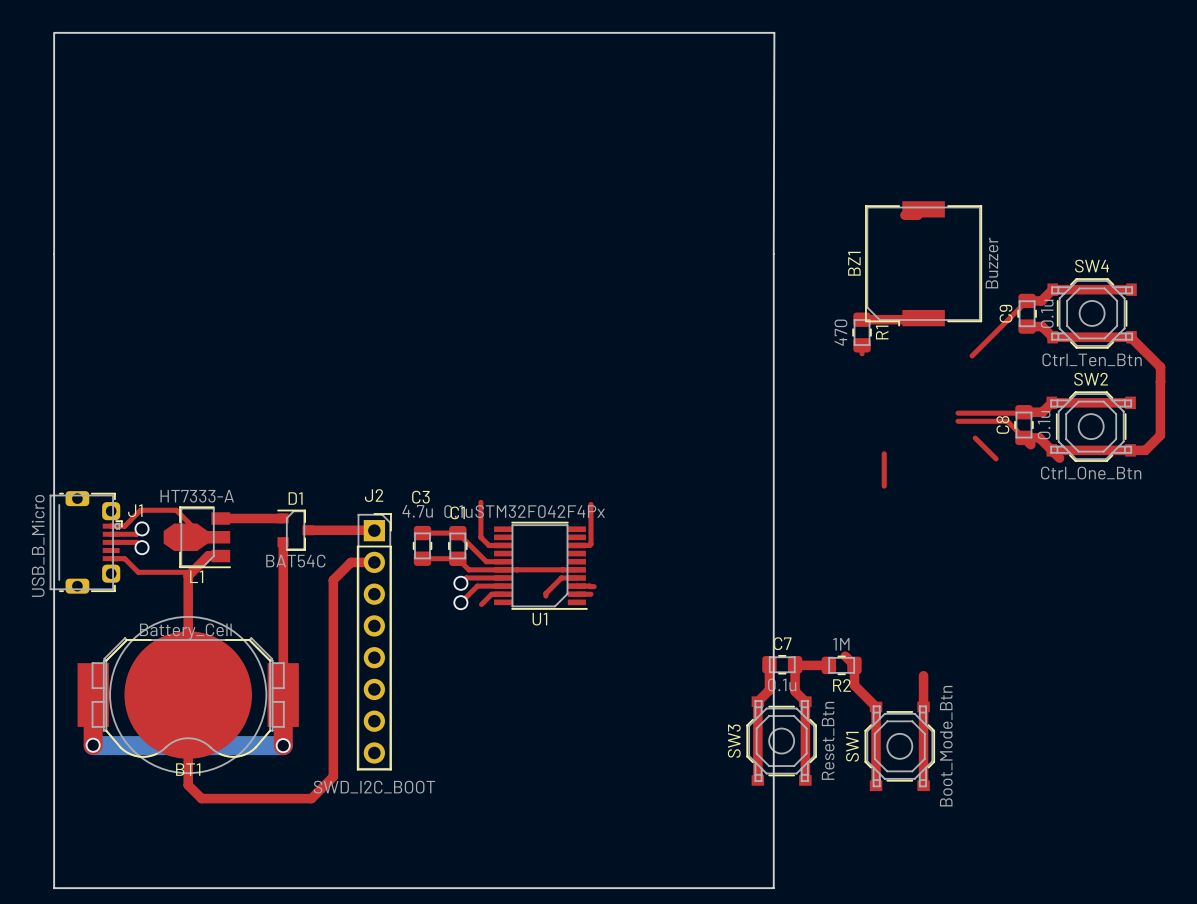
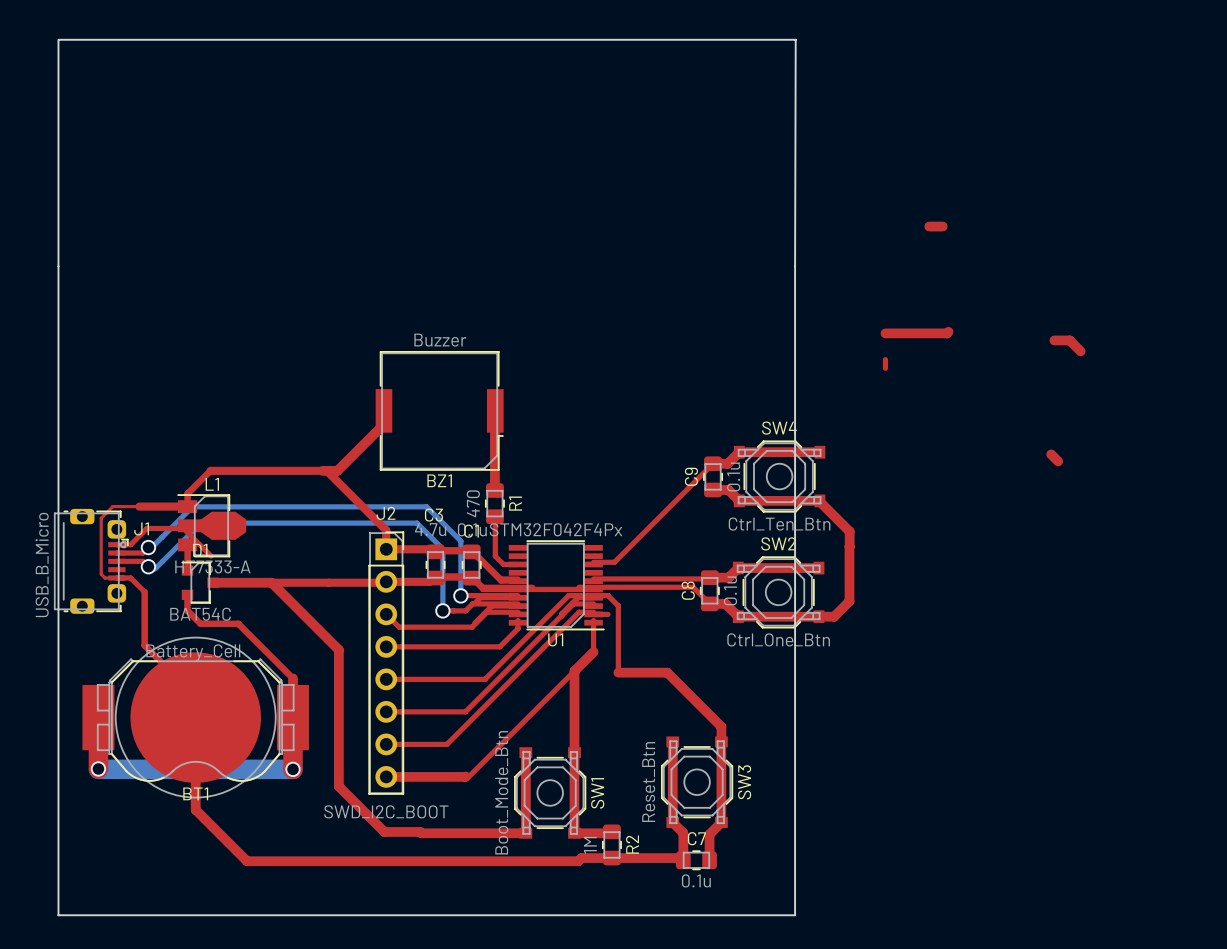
BZ1 rotation: 0° (923, 263) -> 90° counterclockwise (439, 410)
BZ1 position: (923, 263) -> (439, 410)
top track: (1131, 289) (1052, 289) (1041, 300) (1027, 300) (972, 355) -> none
C9 position: (1027, 313) -> (713, 476)
SW4 position: (1092, 313) -> (779, 476)
R1 position: (862, 332) -> (494, 503)
top track: (1051, 338) (1131, 337) (1160, 367) (1160, 381) -> none
top track: (1160, 381) (1160, 435) (1145, 450) (1051, 450) -> none
top track: none -> (383, 410) (383, 424) (337, 470) (322, 470)
top track: none -> (495, 410) (494, 490)
top track: (1130, 402) (1051, 402) (1042, 412) (958, 413) -> none
top track: (958, 421) (1007, 421) (1023, 437) (1039, 437) (1059, 458) -> none
C8 position: (1023, 425) -> (709, 590)
SW2 position: (1091, 426) -> (778, 592)
top track: none -> (819, 452) (739, 452) (727, 463) (713, 463) (614, 562) (593, 562)
top track: (975, 438) (996, 458) -> none
top track: (884, 453) (884, 486) -> none
top track: none -> (713, 489) (728, 489) (739, 500)
top track: none -> (739, 500) (819, 500) (849, 531) (849, 546)
top track: (590, 504) (590, 544) (576, 545) -> none
top track: (220, 518) (282, 518) -> none
bottom track: none -> (154, 545) (192, 506) (426, 506) (460, 541) (460, 595)
top track: none -> (187, 544) (187, 570)
top track: none -> (849, 546) (849, 601) (834, 616) (738, 616) (725, 603) (709, 603) (693, 587) (579, 587)
D1 position: (295, 530) -> (200, 582)
top track: (308, 530) (373, 530) -> none
L1 rotation: 0° (197, 537) -> 180° (211, 525)
top track: (283, 542) (283, 656) -> (187, 594) (187, 610) (200, 623) (238, 623) (292, 678)
top track: none -> (818, 568) (738, 568) (728, 577) (708, 578) (593, 578)
bottom track: none -> (154, 569) (200, 523) (416, 523) (442, 549) (442, 610)
top track: (211, 555) (208, 555) (188, 575) (188, 674) -> (144, 591) (144, 645) (195, 696)
top track: none -> (116, 577) (105, 577) (101, 574) (101, 518) (112, 506) (187, 506) (187, 493) (210, 470) (326, 470) (386, 530) (386, 549) (471, 549) (500, 578) (518, 578)
top track: (374, 562) (350, 562) (333, 580) -> none
top track: none -> (532, 587) (483, 587) (471, 575) (435, 575) (429, 581) (213, 582) (271, 582) (338, 649) (338, 786) (384, 831) (525, 833) (525, 752)
top track: (138, 572) (190, 572) -> none
top track: none -> (518, 595) (460, 595)
via: none -> (460, 595)
top track: (333, 580) (333, 776) (311, 798) (201, 798) -> (683, 860) (681, 858) (581, 858) (578, 861) (247, 861) (209, 823)
via: (460, 583) -> none
top track: none -> (518, 603) (472, 603) (465, 610) (442, 610)
top track: none -> (593, 603) (573, 603) (465, 711) (386, 711)
top track: (576, 586) (594, 586) -> none
via: none -> (442, 610)
top track: none -> (518, 612) (487, 612) (472, 627) (399, 627) (386, 614)
top track: none -> (593, 612) (579, 612) (446, 744) (386, 744)
top track: (503, 594) (491, 594) (481, 604) -> none
top track: none -> (518, 620) (518, 628) (499, 646) (386, 646)
top track: none -> (593, 620) (593, 652)
via: (460, 602) -> none
top track: none -> (593, 652) (574, 671) (574, 833) (611, 831)
top track: none -> (593, 652) (468, 776)
R2 value position: 1M (841, 644) -> 1M (590, 845)
top track: (845, 656) (854, 665) (854, 685) (876, 706) (876, 785) -> none
top track: none -> (386, 679) (484, 679) (568, 595) (608, 595) (618, 605) (618, 672) (667, 672) (721, 726) (721, 822) (709, 834) (710, 861)
top track: (768, 663) (769, 690) (757, 701) (757, 780) -> none
C7 position: (782, 664) -> (696, 860)
top track: (828, 665) (795, 664) (795, 691) (805, 701) (805, 780) -> none
R2 rotation: 0° (841, 665) -> 90° clockwise (611, 844)
R2 position: (841, 665) -> (611, 844)
top track: (923, 675) (923, 785) -> none
R2 name position: R2 (841, 685) -> R2 (632, 844)
top track: none -> (672, 741) (672, 822) (683, 833) (683, 860)
SW3 value position: Reset_Btn (828, 740) -> Reset_Btn (648, 782)
SW3 name position: SW3 (734, 741) -> SW3 (744, 782)
SW3 position: (781, 741) -> (697, 782)
SW1 name position: SW1 (852, 746) -> SW1 (597, 793)
SW1 position: (899, 746) -> (550, 792)
SW1 value position: Boot_Mode_Btn (946, 746) -> Boot_Mode_Btn (501, 792)
top track: none -> (465, 776) (386, 776)

